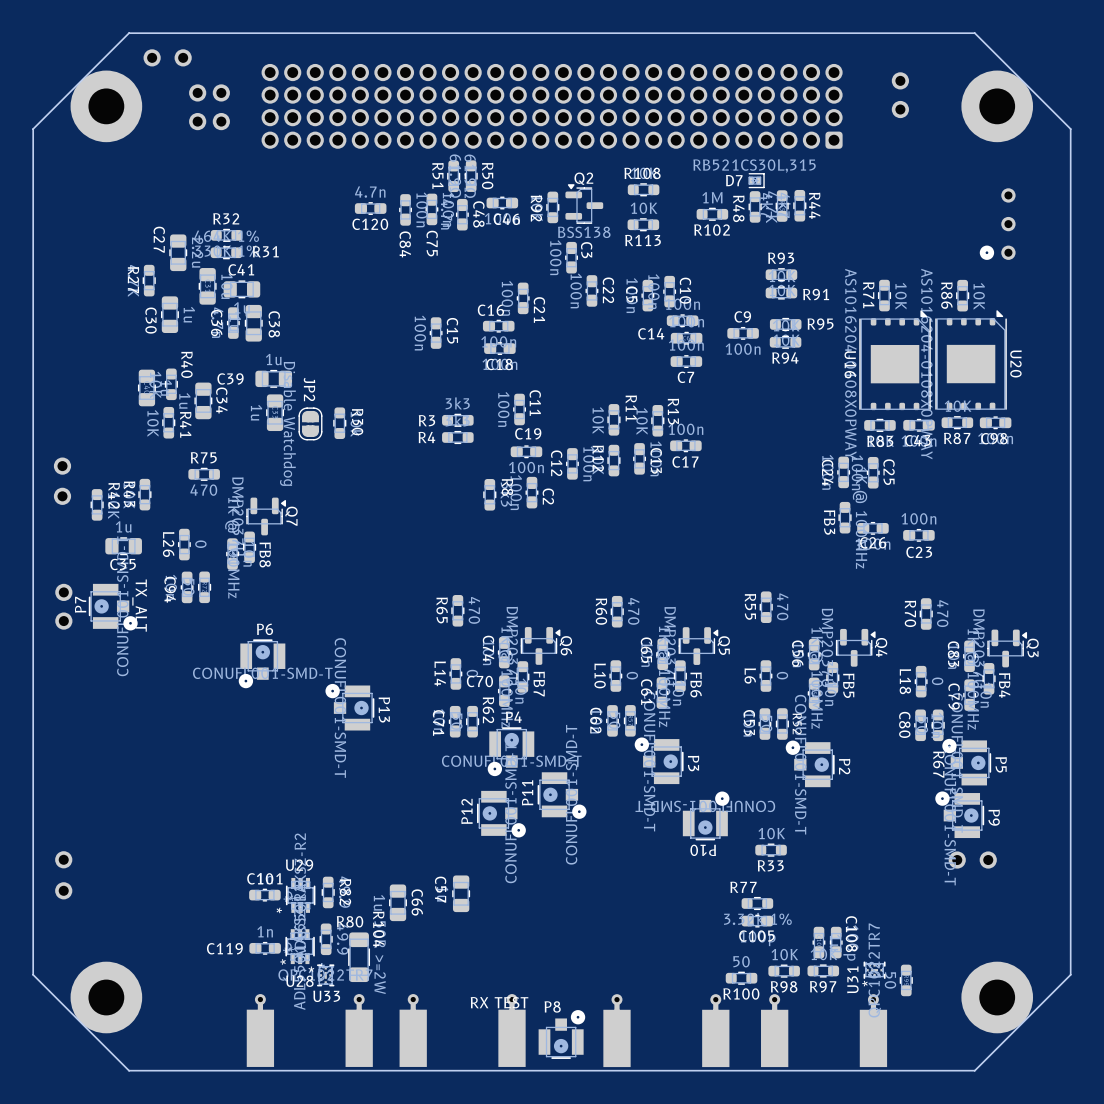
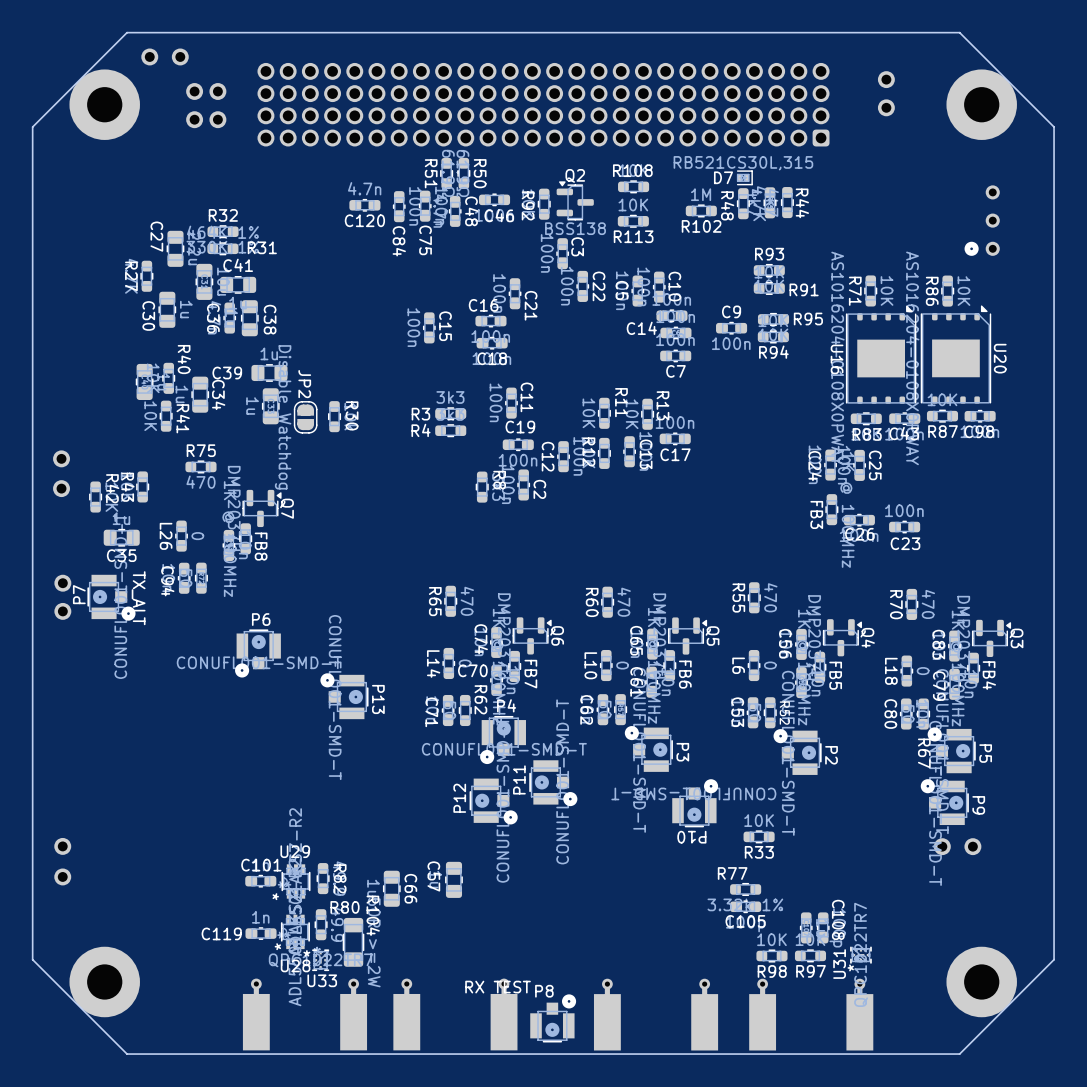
R100: 50 (741, 978) -> none
part: 50 (906, 980) -> none

